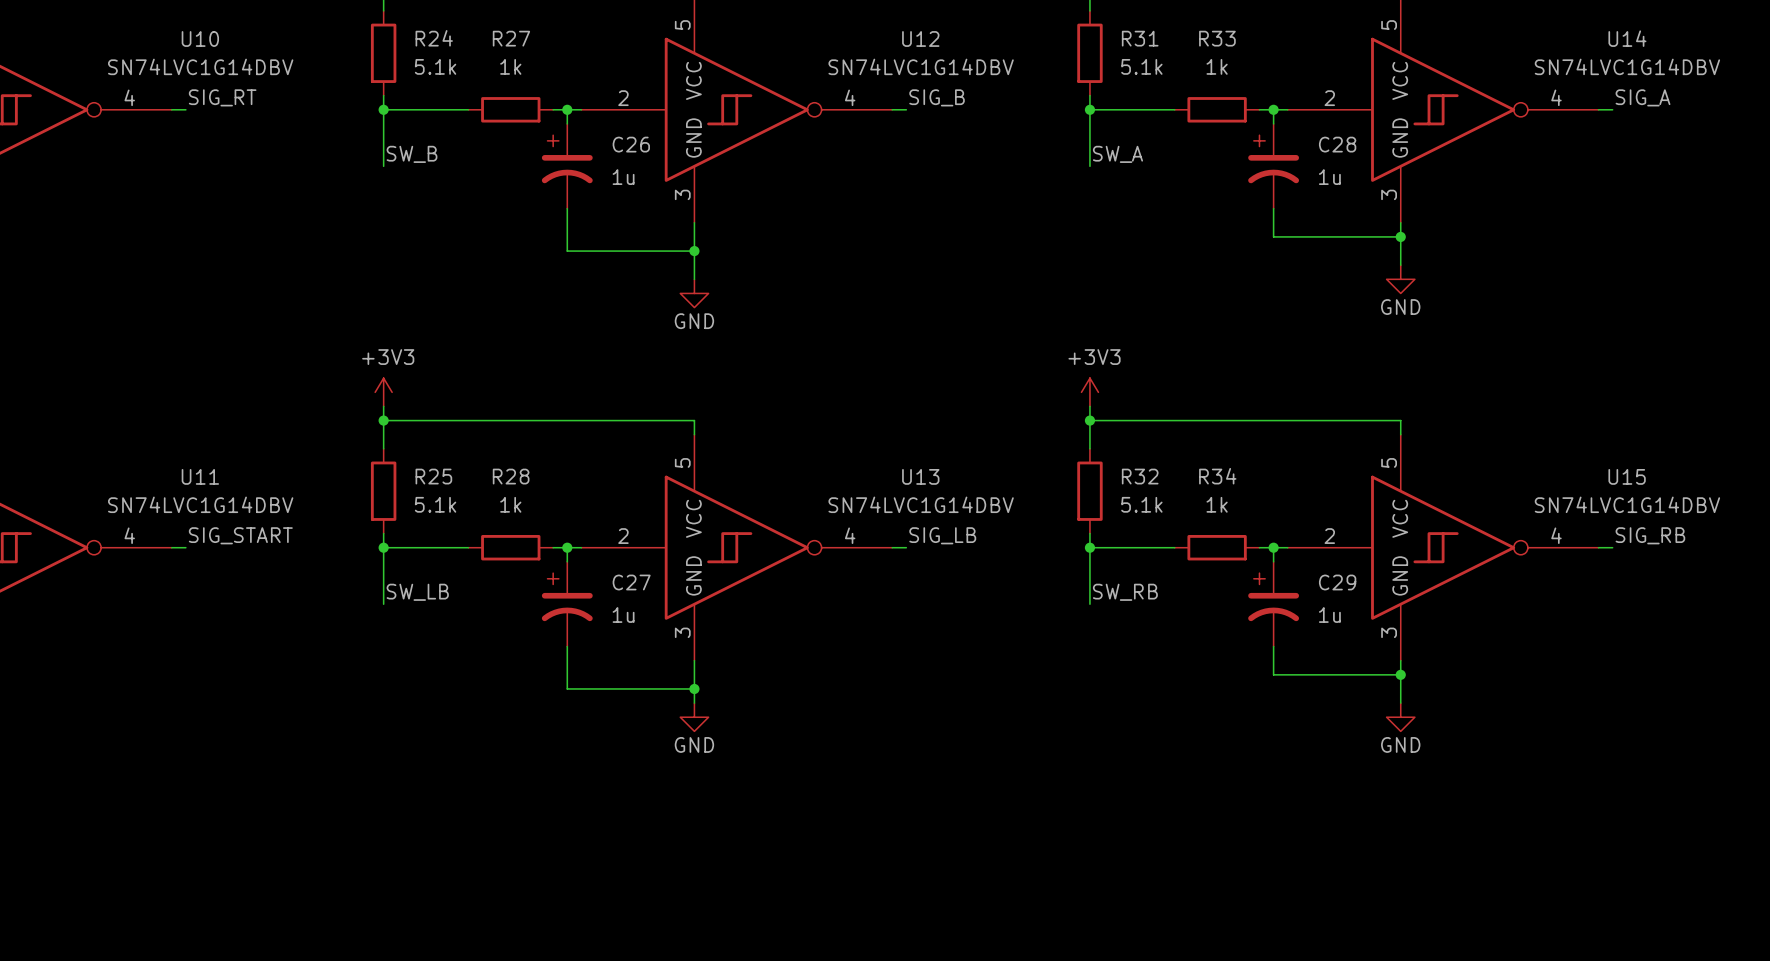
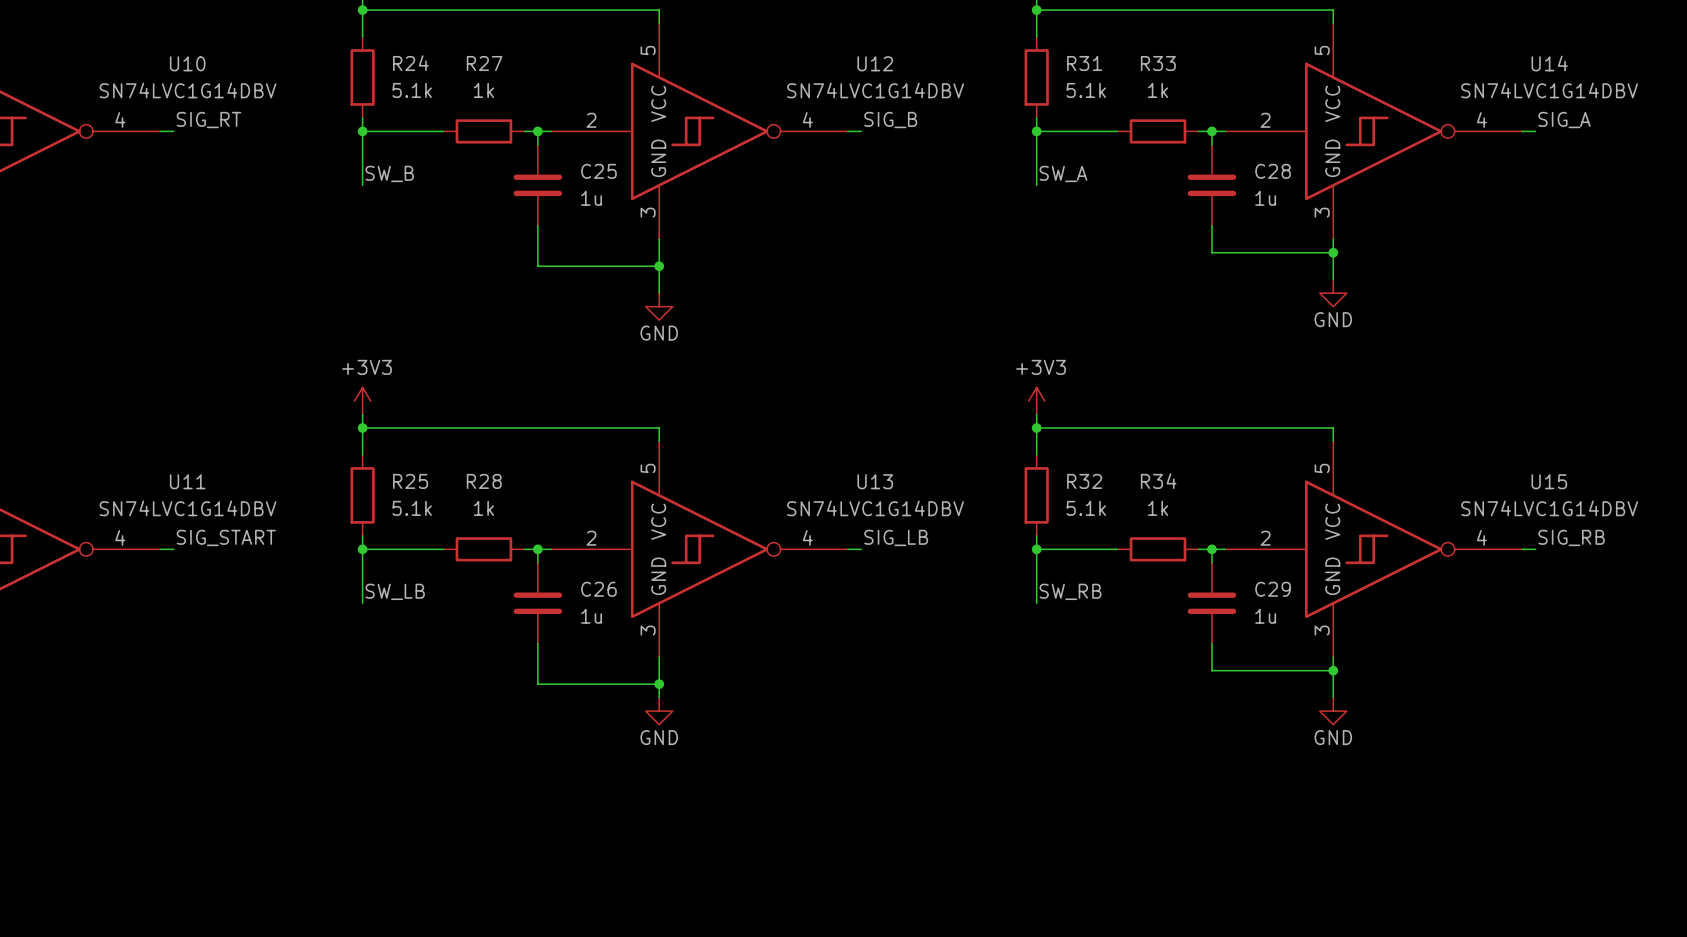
C26 symbol: [541, 123, 593, 209] -> [513, 562, 563, 644]
C28 symbol: [1248, 123, 1300, 209] -> [1187, 144, 1237, 226]
C25: none -> 1u (537, 185)
C29 symbol: [1248, 561, 1300, 647] -> [1187, 562, 1237, 644]
C27: 1u (567, 604) -> none

